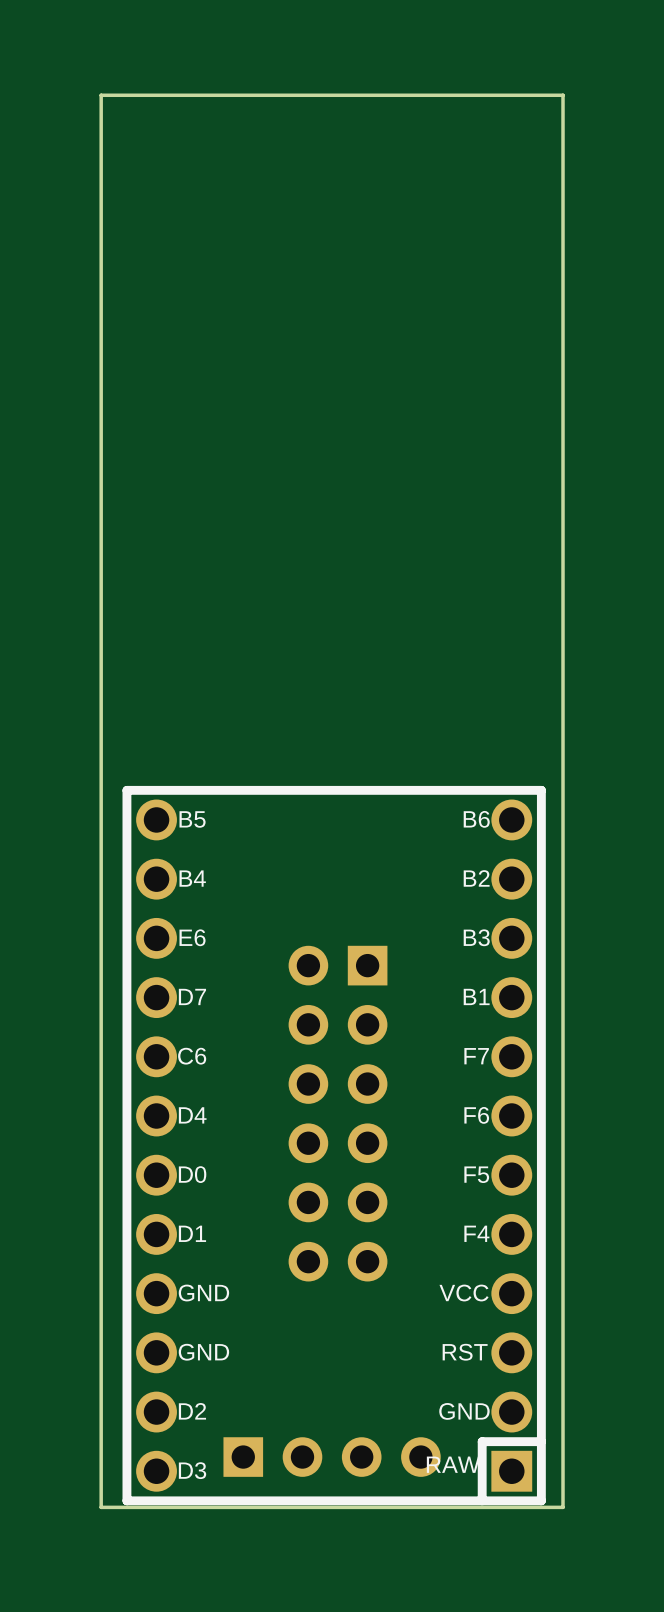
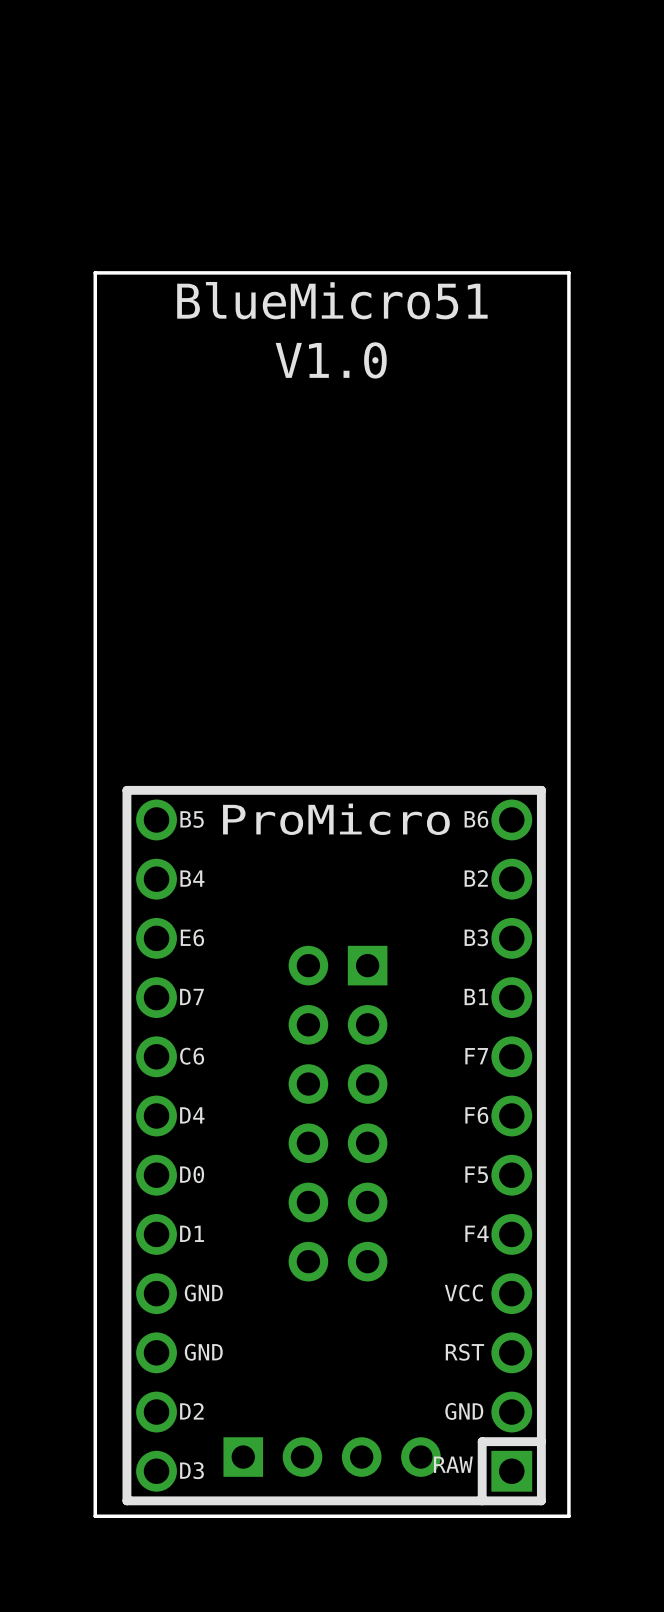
board edge: (563, 95) (101, 95) (101, 1507) (563, 1507) (563, 95) -> (568, 272) (568, 1516) (95, 1516) (95, 272) (568, 272)
text: none -> BlueMicro51 (332, 300)
text: none -> V1.0 (331, 360)
part value: none -> ProMicro (336, 819)

